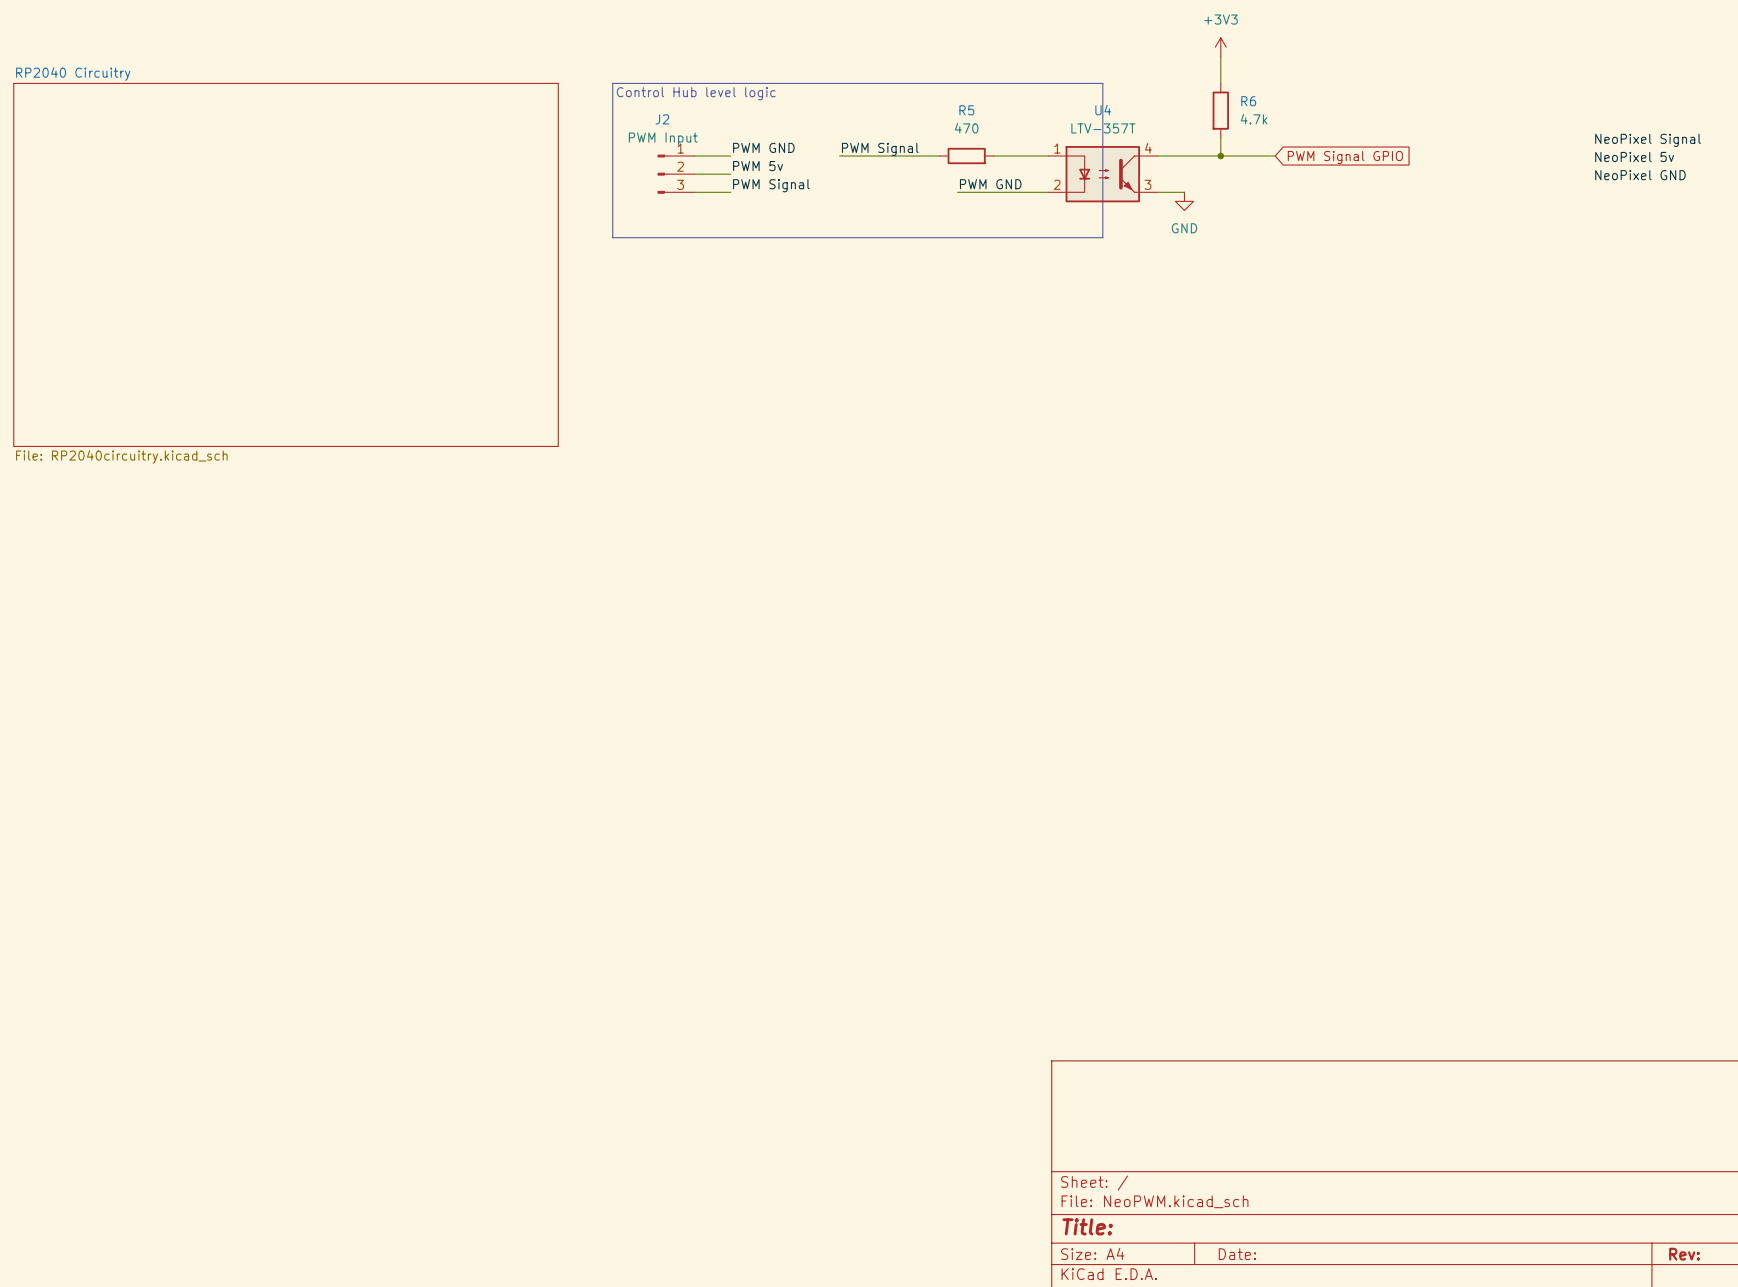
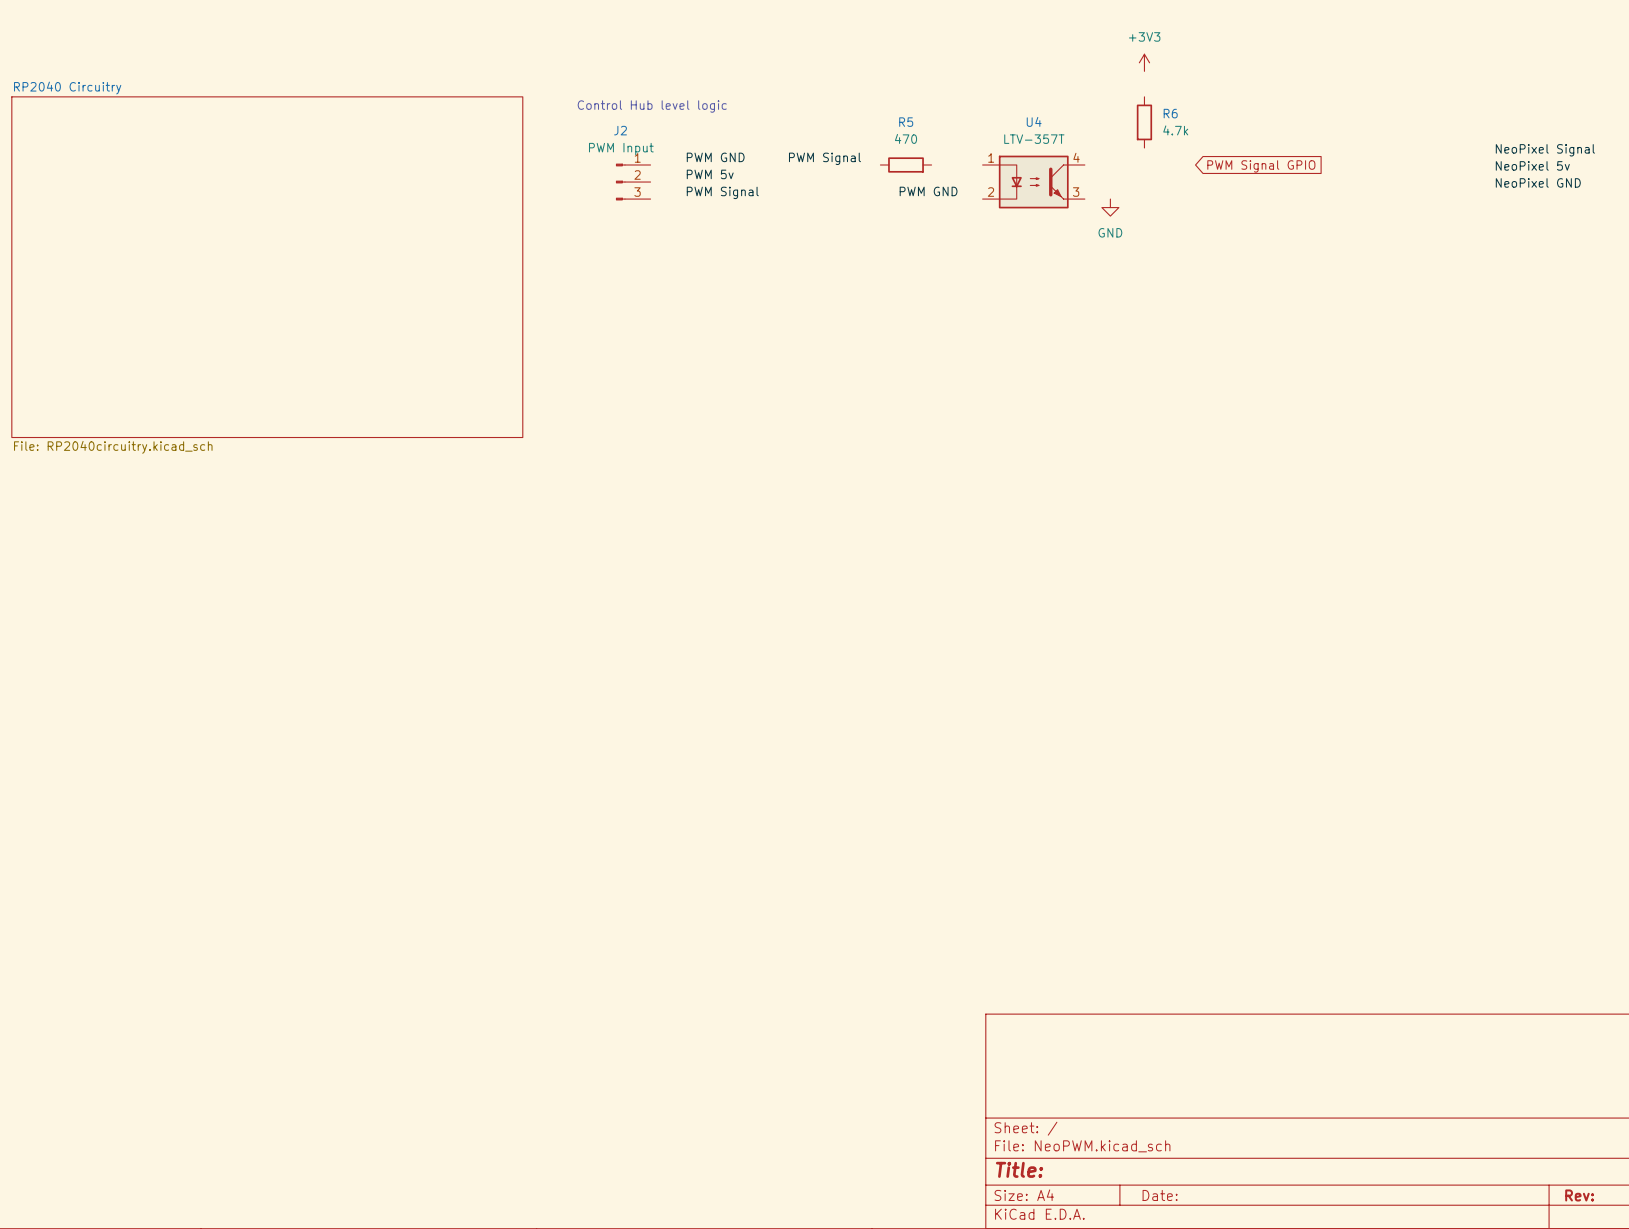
wire: (1220, 56) (1220, 83) -> none
line: (612, 83) (1102, 83) (1102, 237) (612, 237) (612, 83) -> none
wire: (1220, 137) (1220, 156) -> none
wire: (694, 156) (730, 156) -> none
wire: (839, 156) (939, 156) -> none
wire: (993, 156) (1048, 156) -> none
wire: (1157, 156) (1275, 156) -> none
junction: (1220, 156) -> none
wire: (694, 174) (730, 174) -> none
wire: (694, 192) (730, 192) -> none
wire: (957, 192) (1048, 192) -> none
wire: (1157, 192) (1184, 192) -> none

